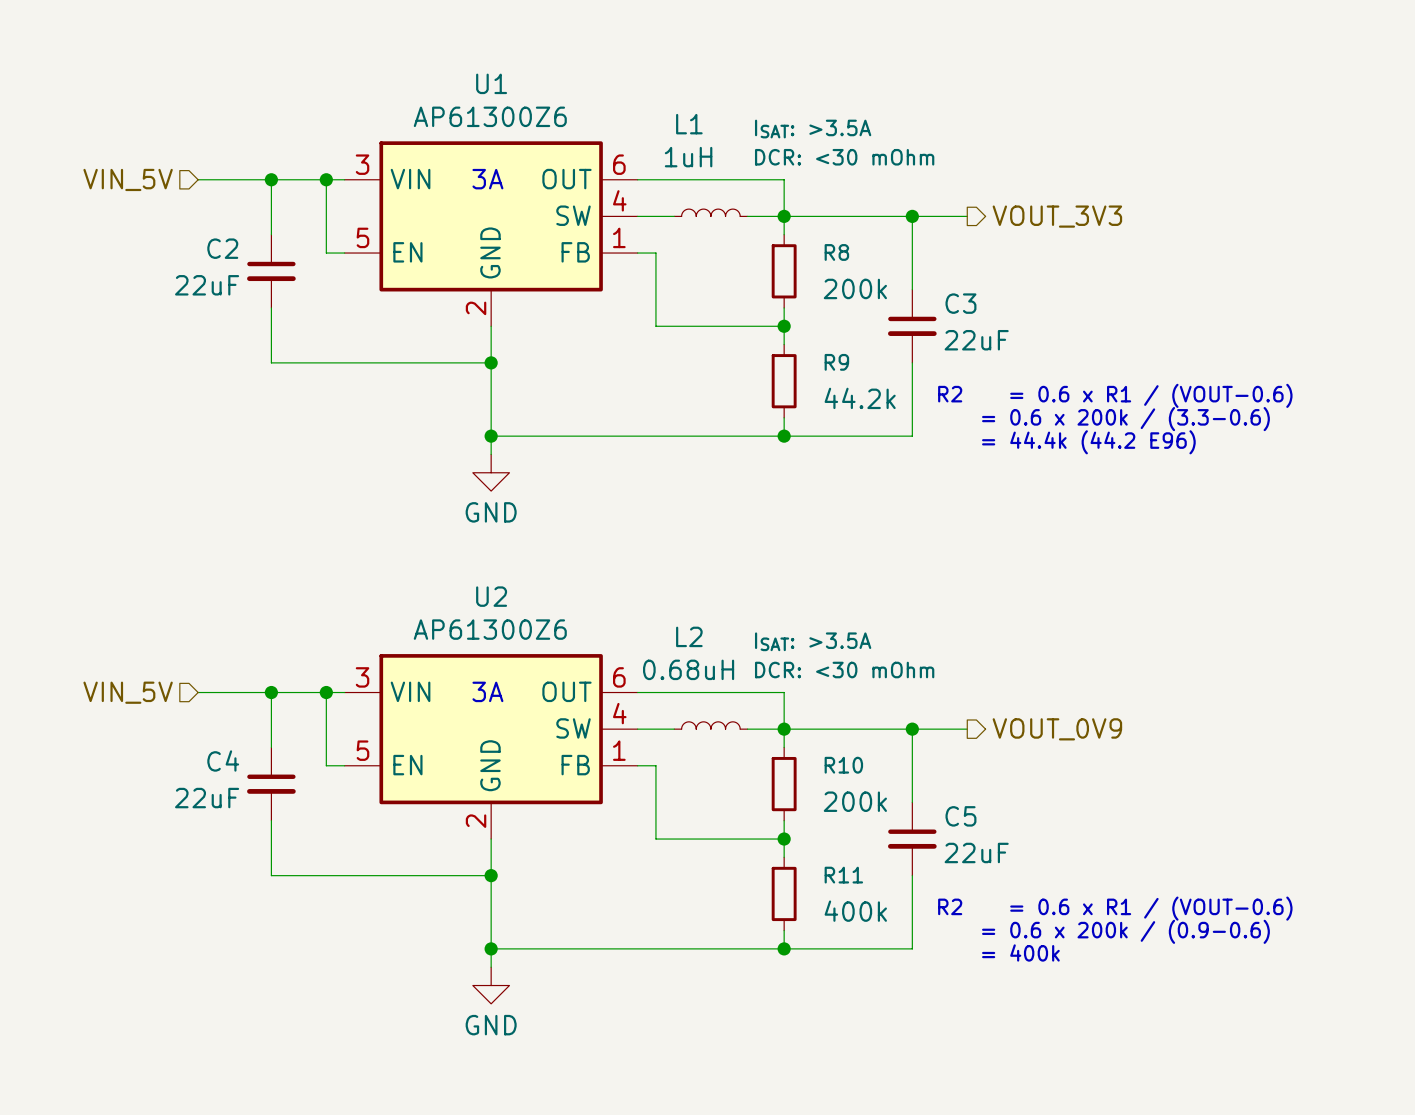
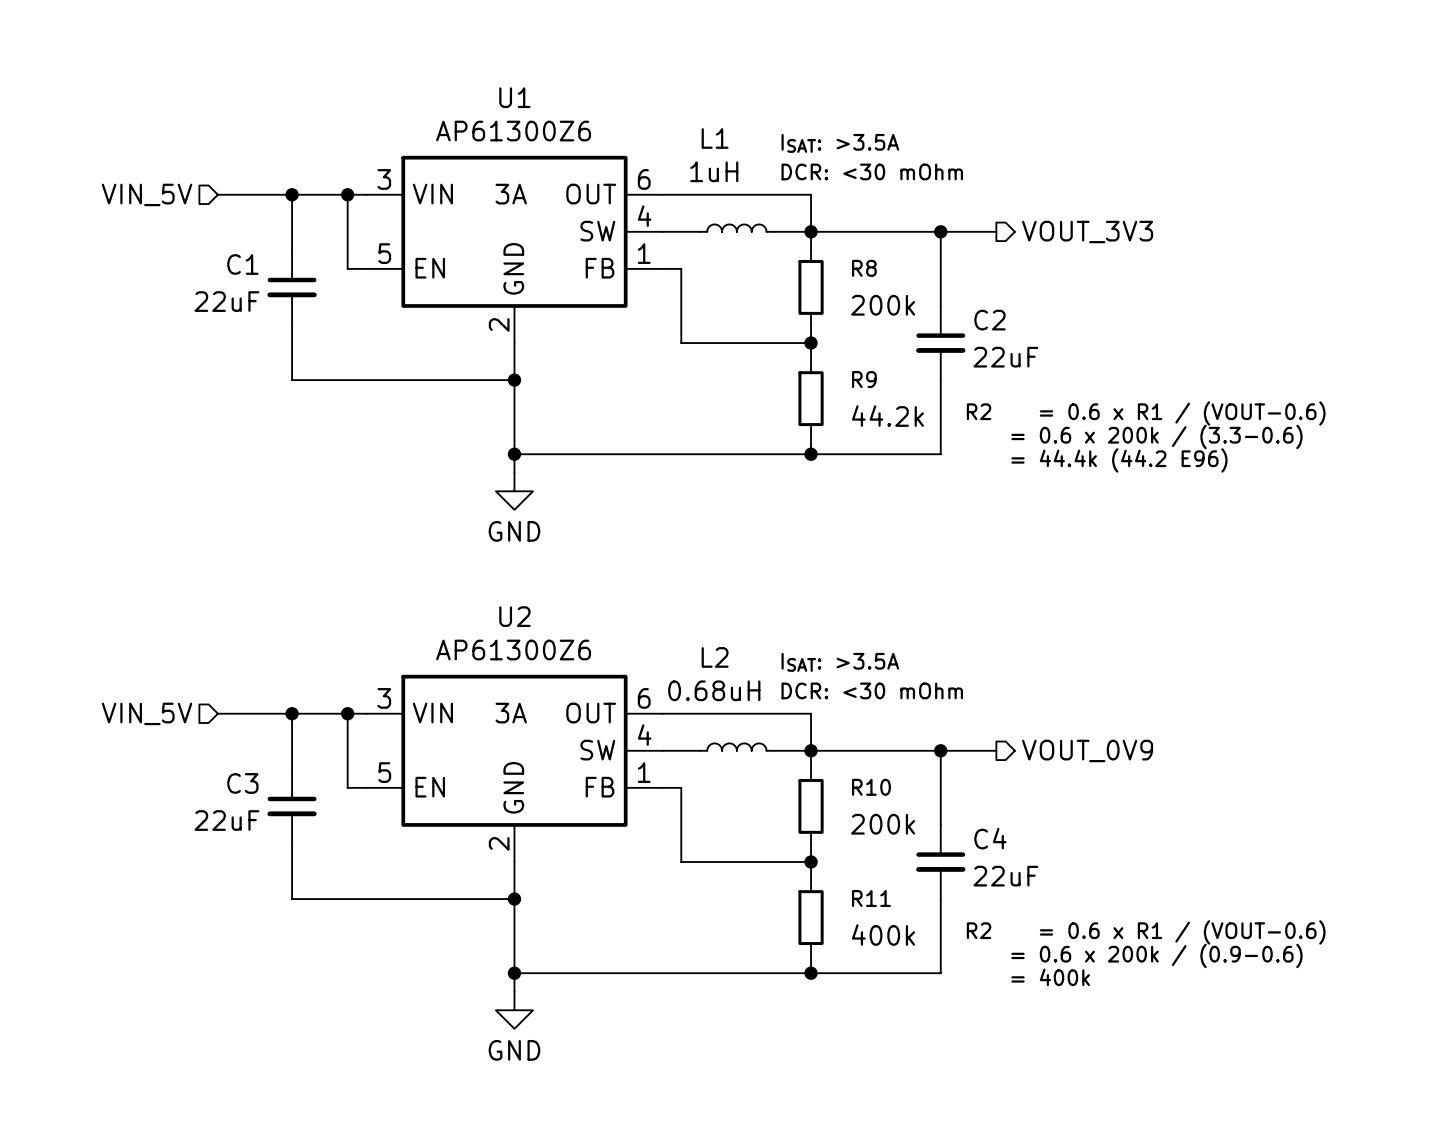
C2 name: C2 (222, 248) -> C1 (242, 264)
C3 name: C3 (960, 303) -> C2 (989, 320)
C4 name: C4 (223, 760) -> C3 (242, 783)
C5 name: C5 (960, 816) -> C4 (990, 838)

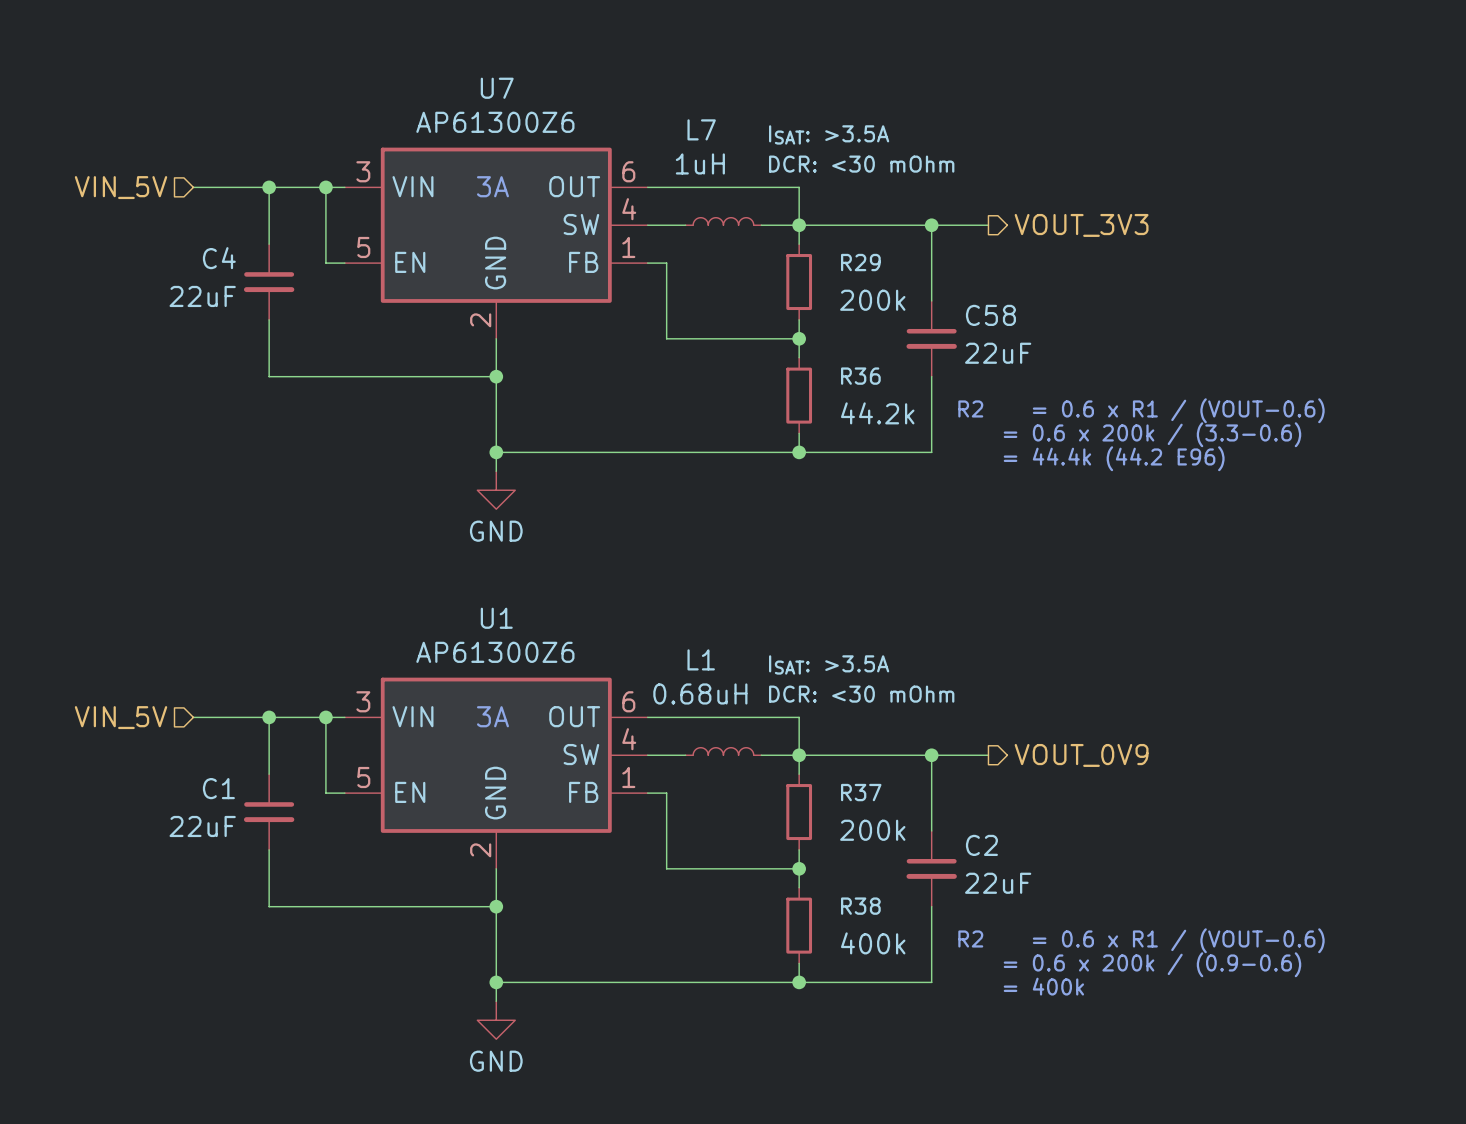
U1 name: U1 (514, 97) -> U7 (497, 88)
L1 name: L1 (715, 138) -> L7 (701, 129)
C1 name: C1 (242, 264) -> C4 (219, 258)
R8 name: R8 (864, 268) -> R29 (860, 262)
C2 name: C2 (989, 320) -> C58 (990, 315)
R9 name: R9 (864, 379) -> R36 (860, 376)
U2 name: U2 (514, 616) -> U1 (496, 618)
L2 name: L2 (715, 657) -> L1 (701, 659)
C3 name: C3 (242, 783) -> C1 (218, 788)
R10 name: R10 (871, 787) -> R37 (861, 792)
C4 name: C4 (990, 838) -> C2 (981, 845)
R11 name: R11 (871, 898) -> R38 (860, 906)

